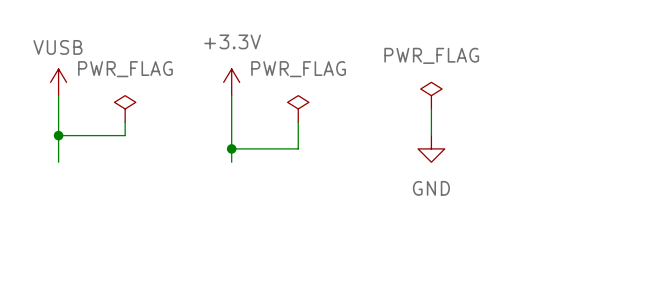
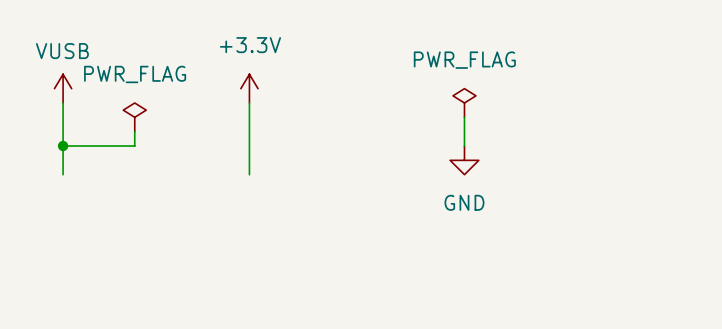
power symbol: PWR_FLAG (298, 108) -> none
wire: (298, 122) (298, 148) (231, 148) -> none
junction: (231, 148) -> none

